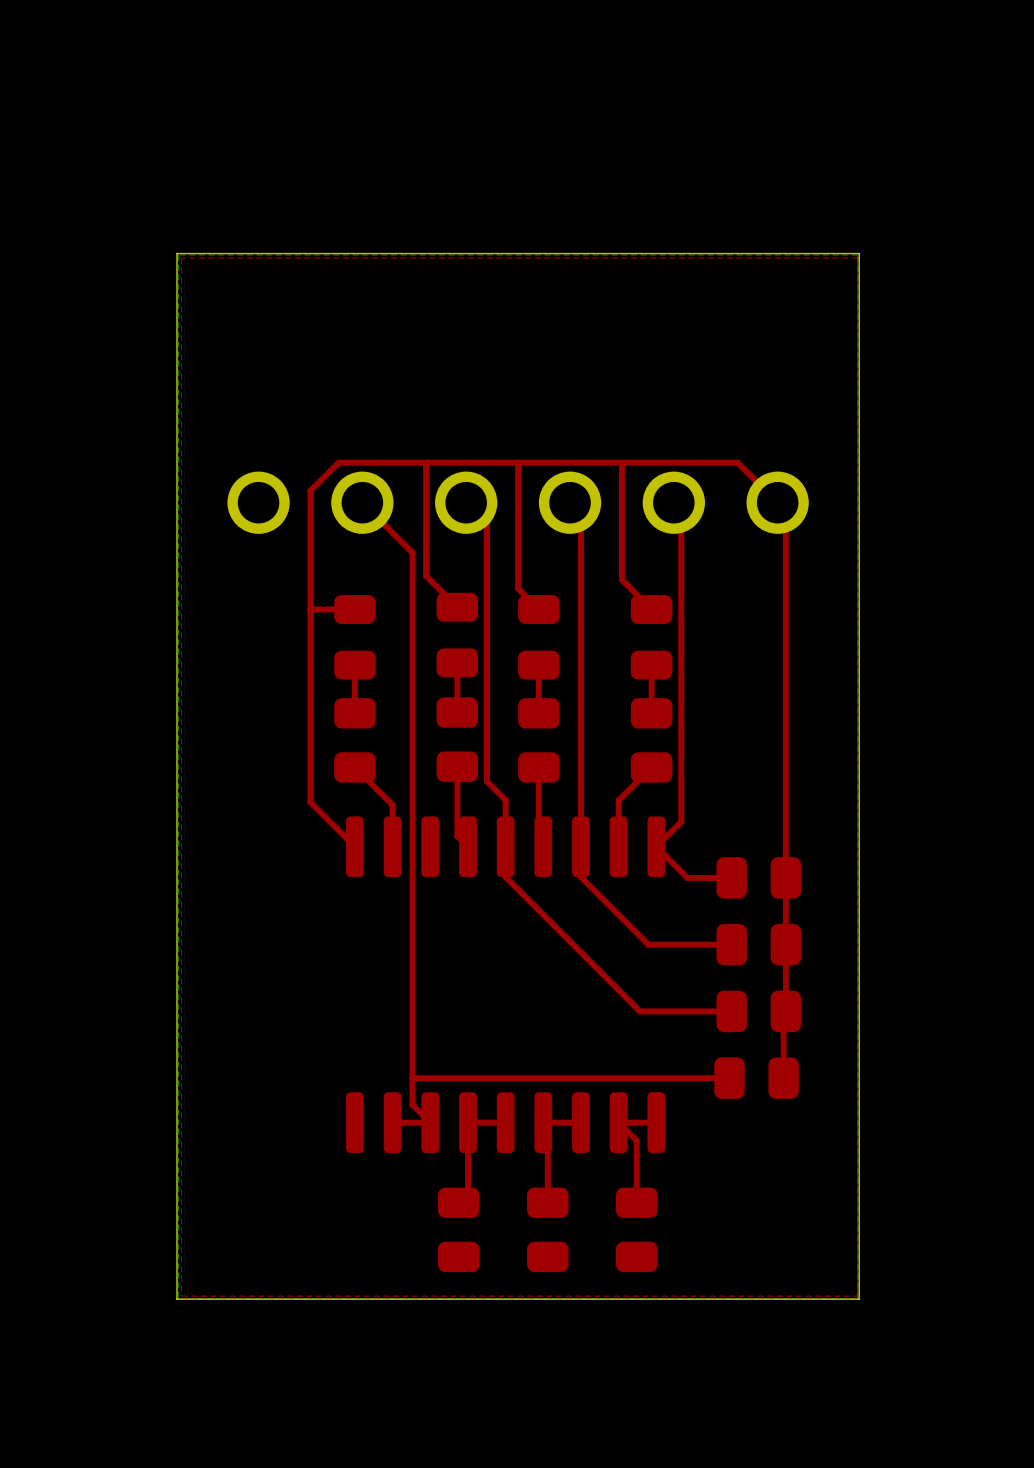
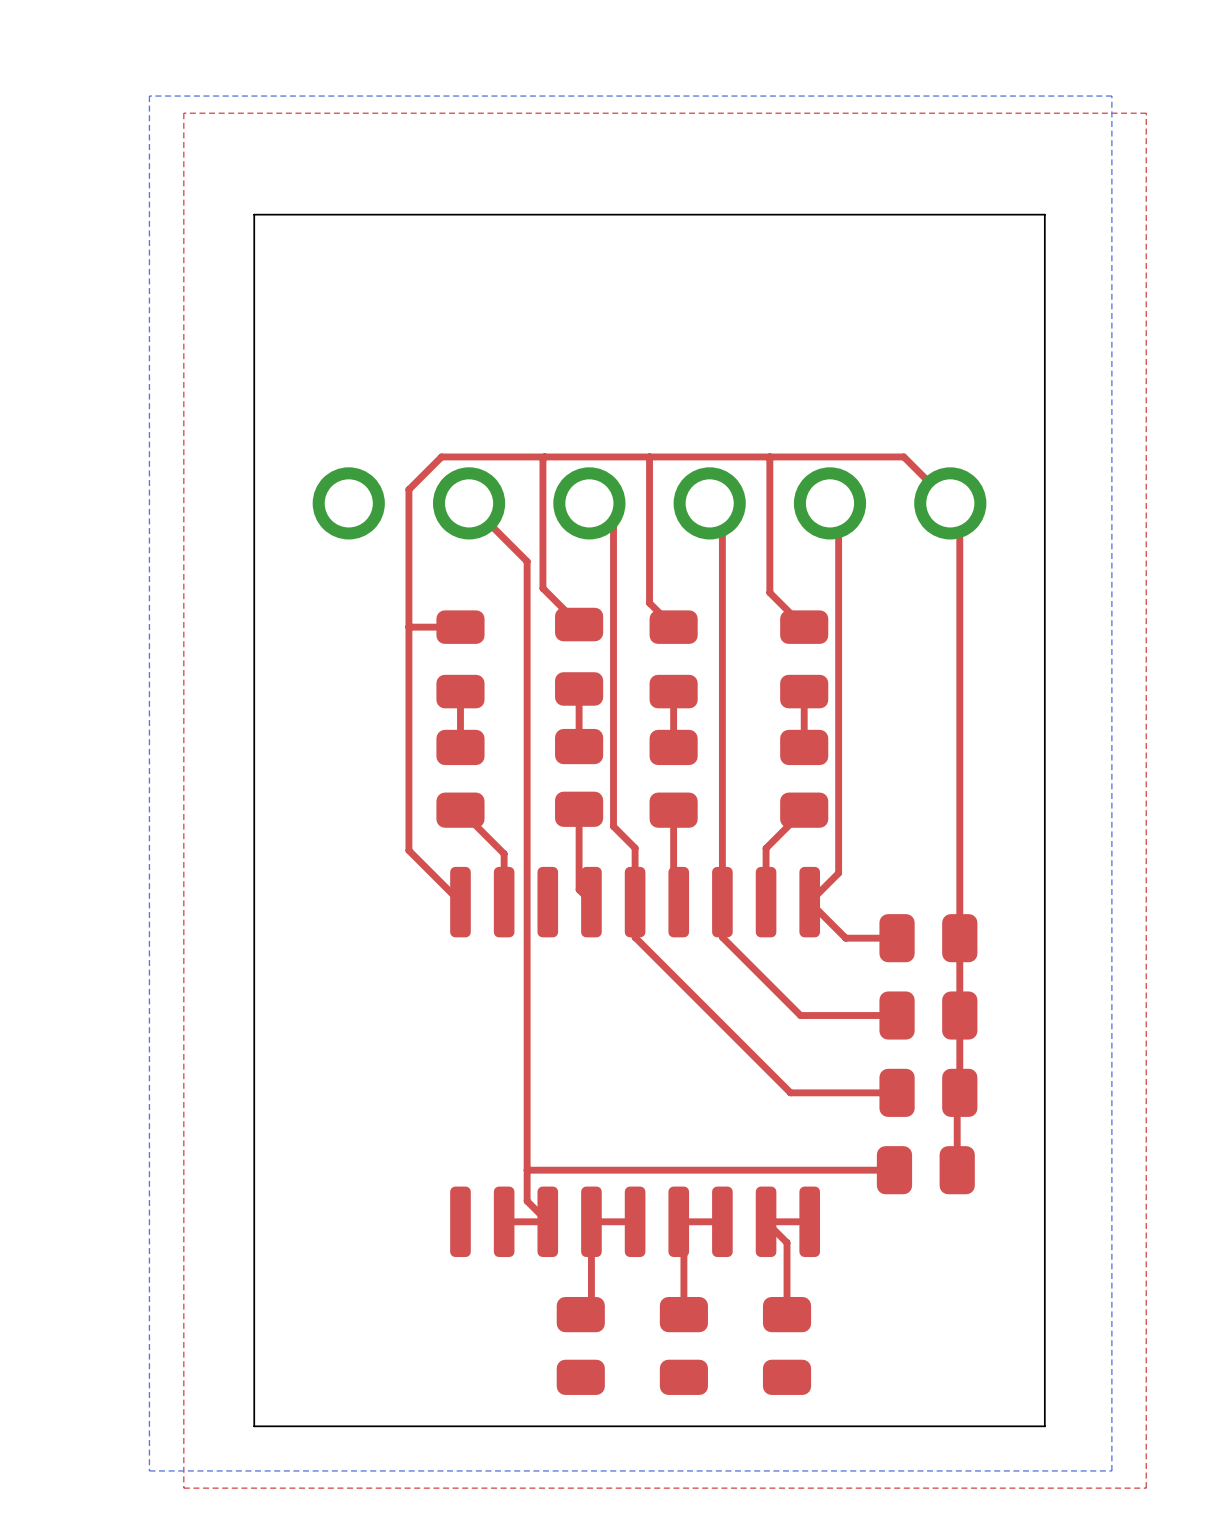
bottom zone outline: (857, 255) (178, 255) (178, 1299) (857, 1299) (857, 255) -> (1111, 96) (1111, 1470) (149, 1470) (149, 96) (1111, 96)
top zone outline: (857, 257) (181, 257) (181, 1296) (857, 1296) (857, 257) -> (1146, 113) (1146, 1488) (183, 1488) (183, 113) (1146, 113)

